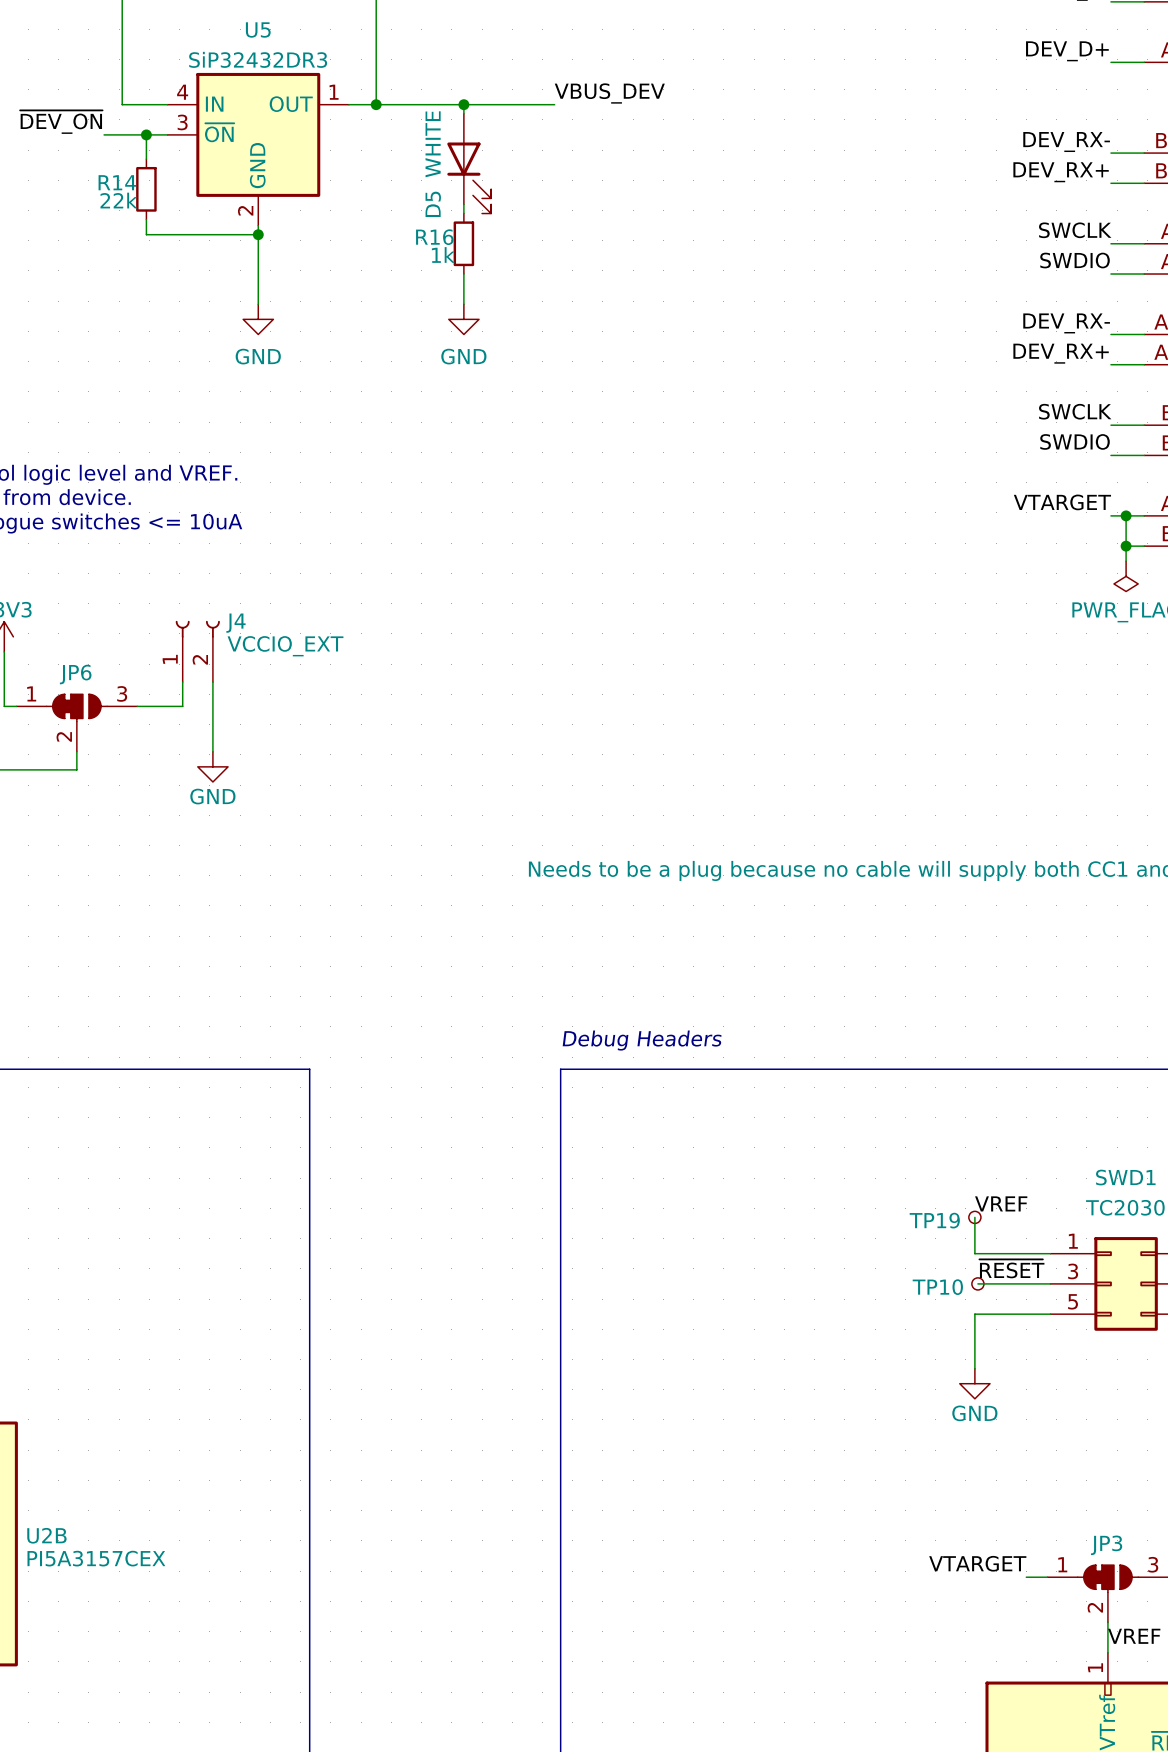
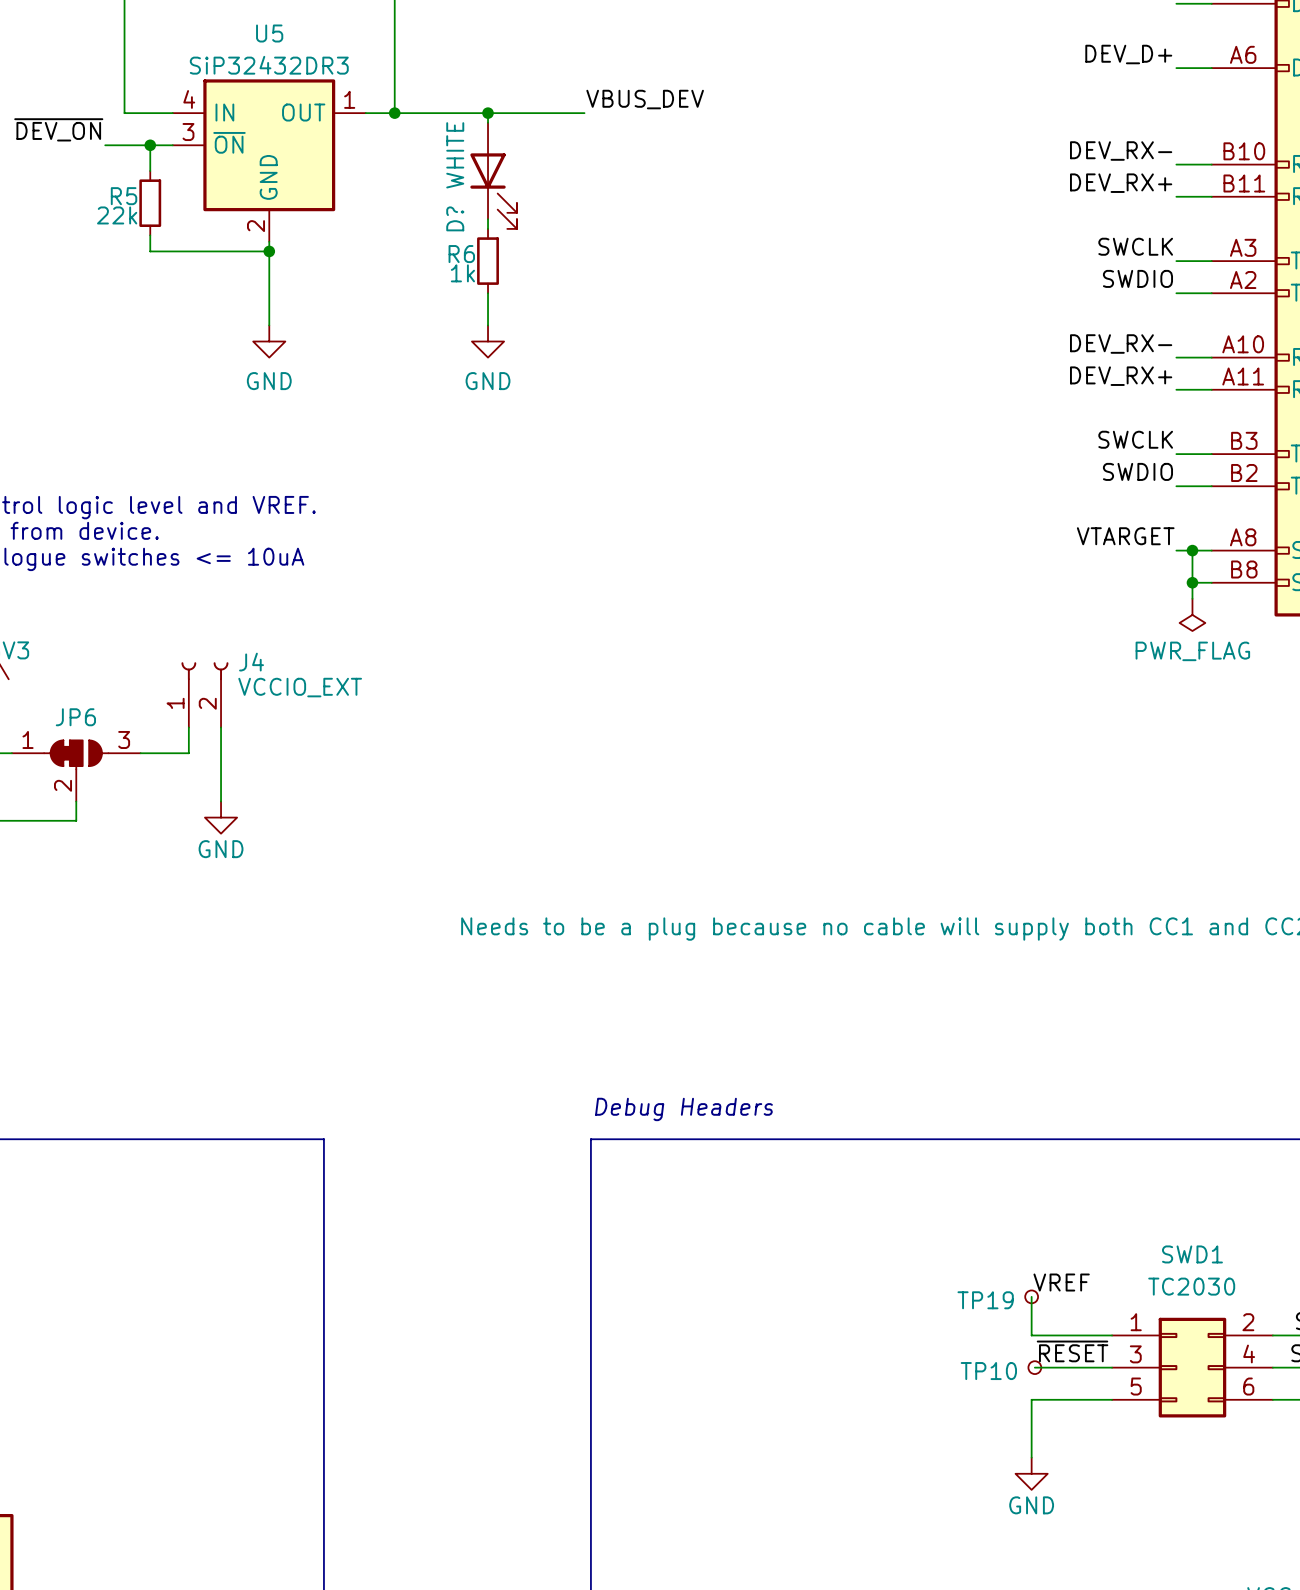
R14 name: R14 (117, 182) -> R5 (124, 196)
D5 name: D5 (433, 204) -> D? (455, 218)
R16 name: R16 (434, 237) -> R6 (461, 254)

